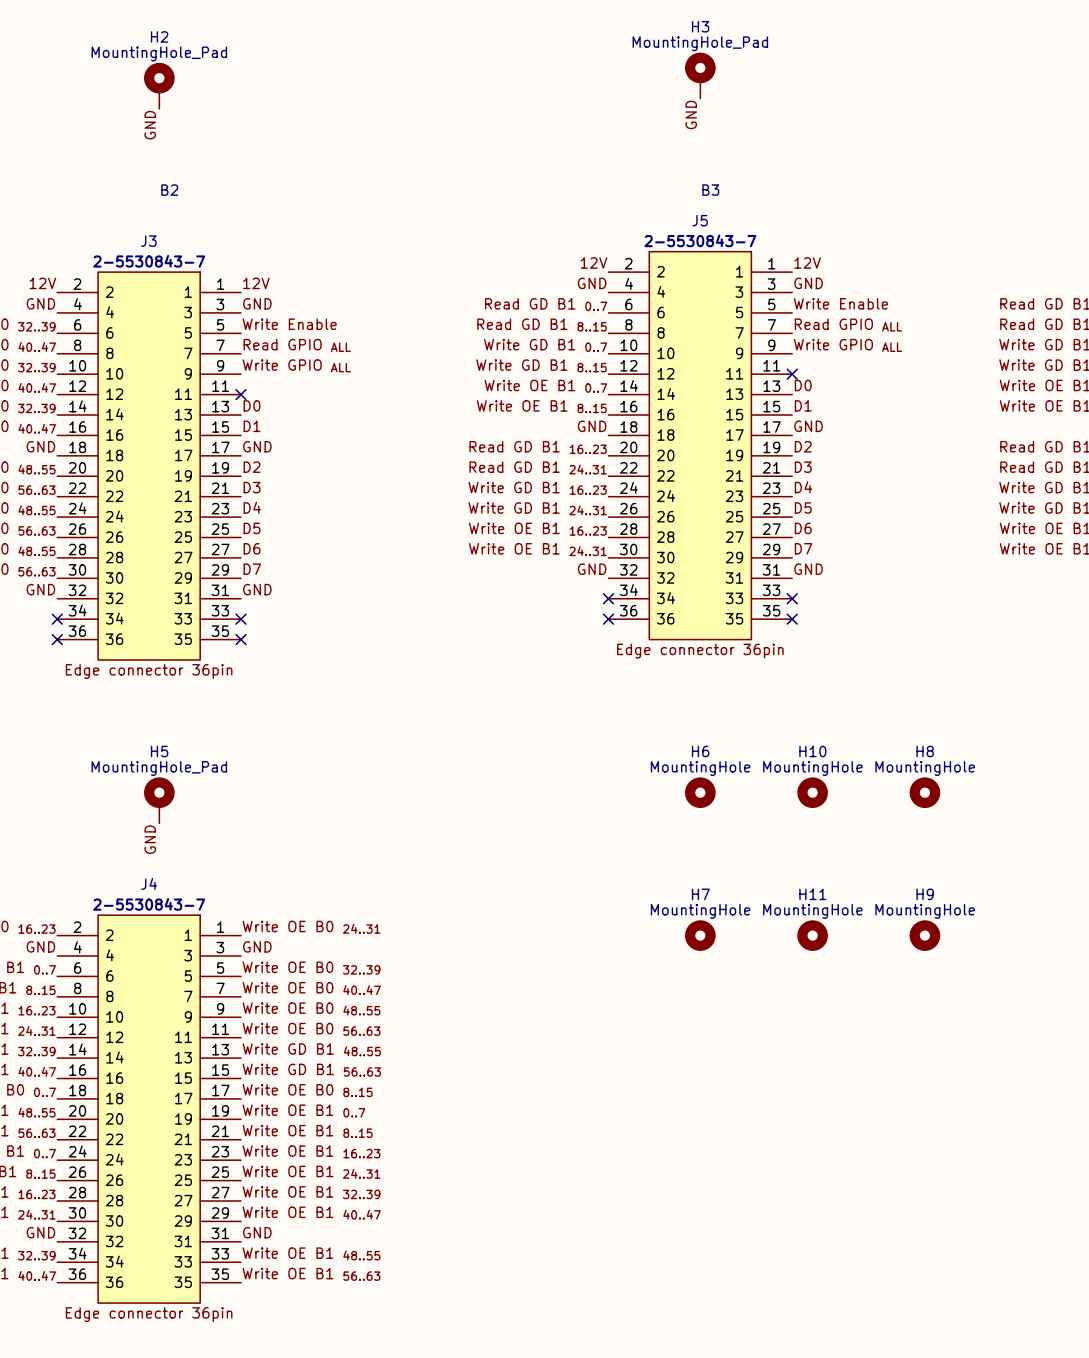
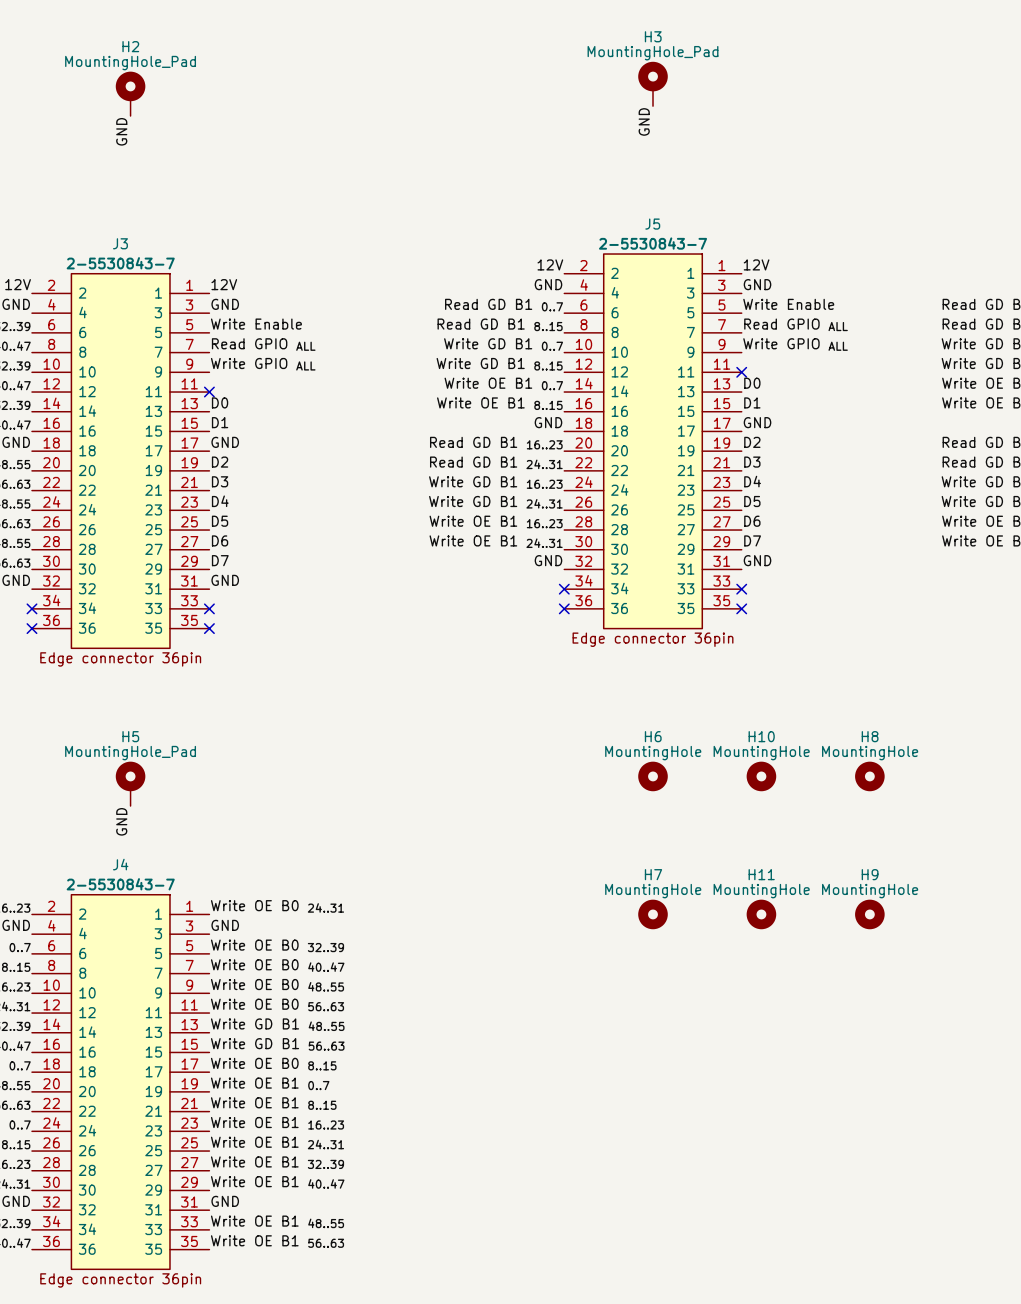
B2: (169, 190) -> none
B3: (710, 190) -> none

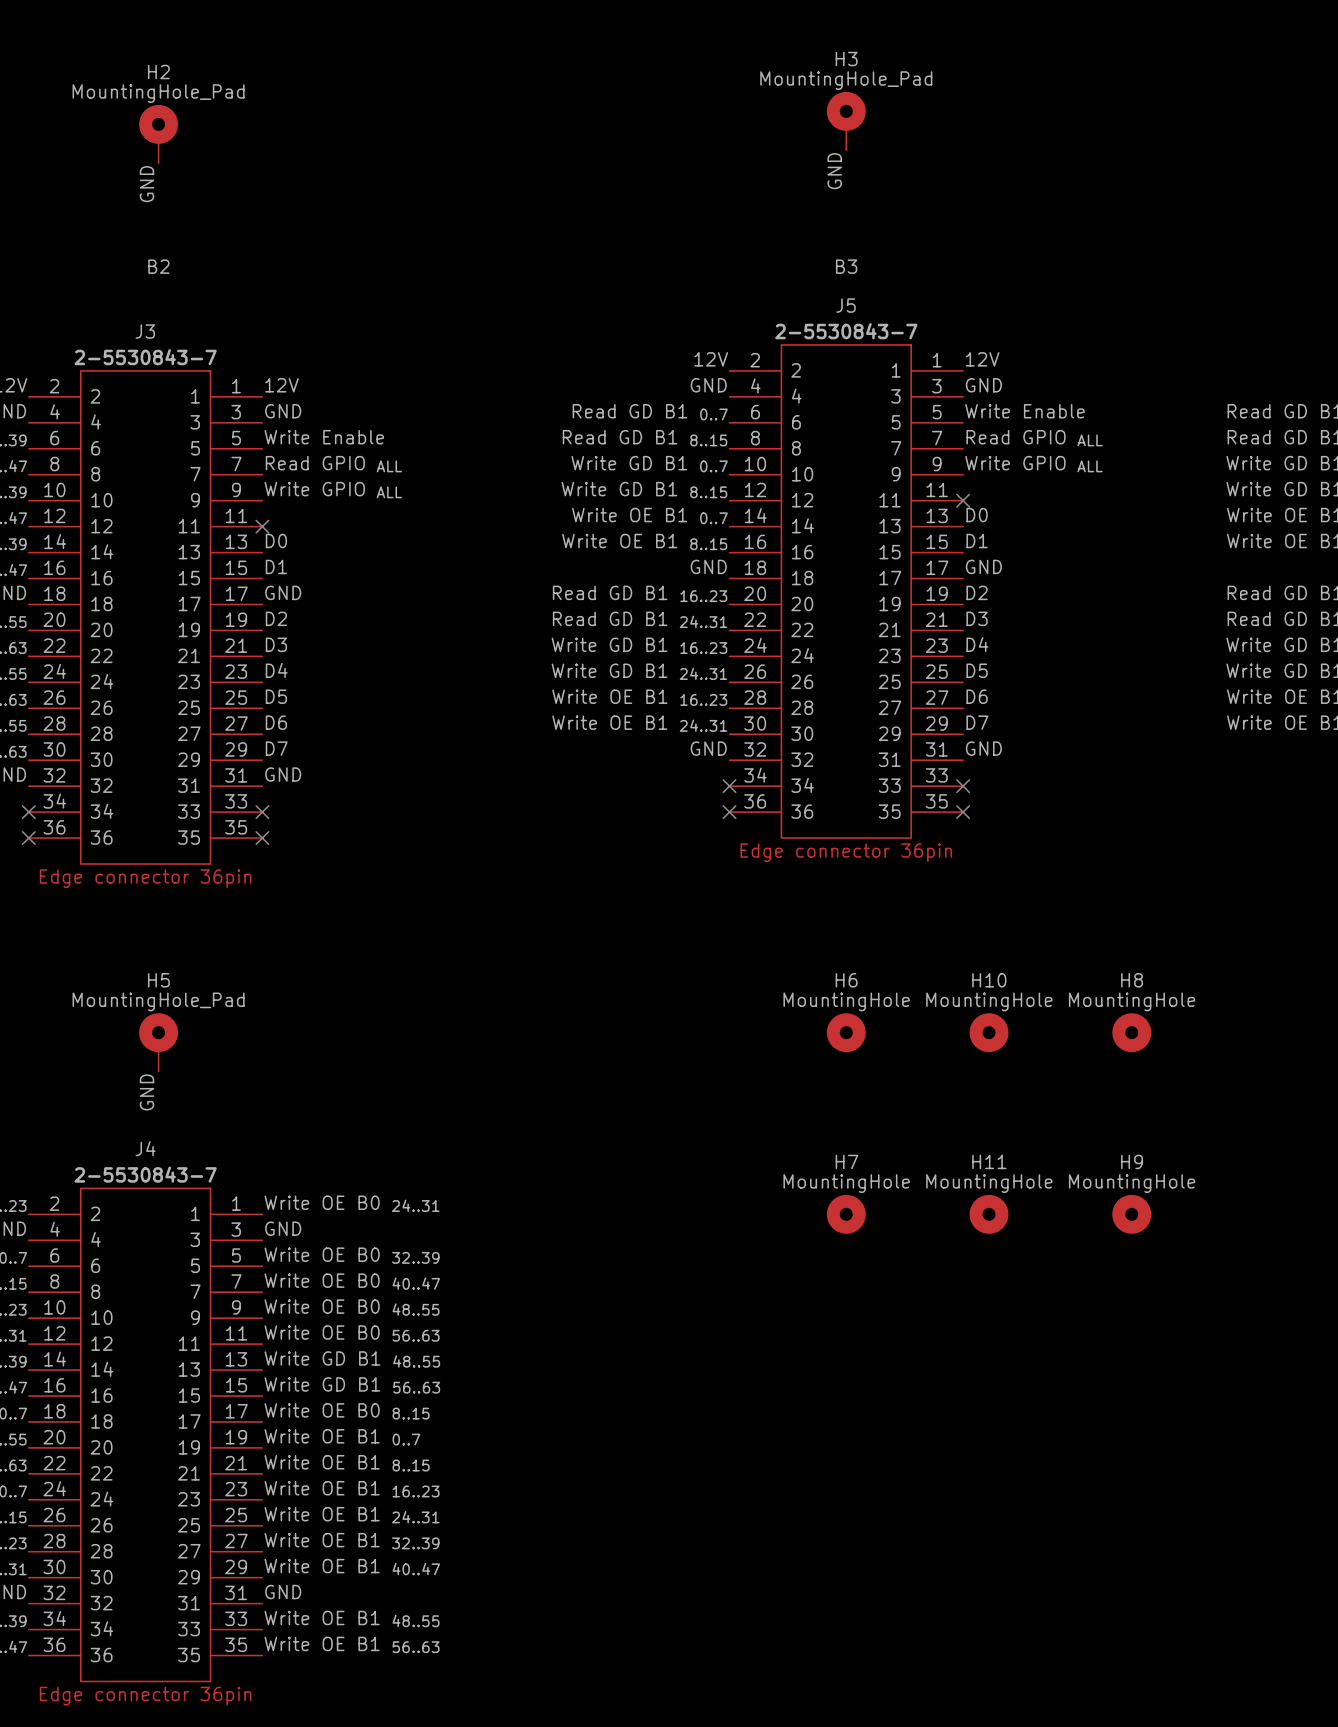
B2: none -> (158, 266)
B3: none -> (846, 266)

